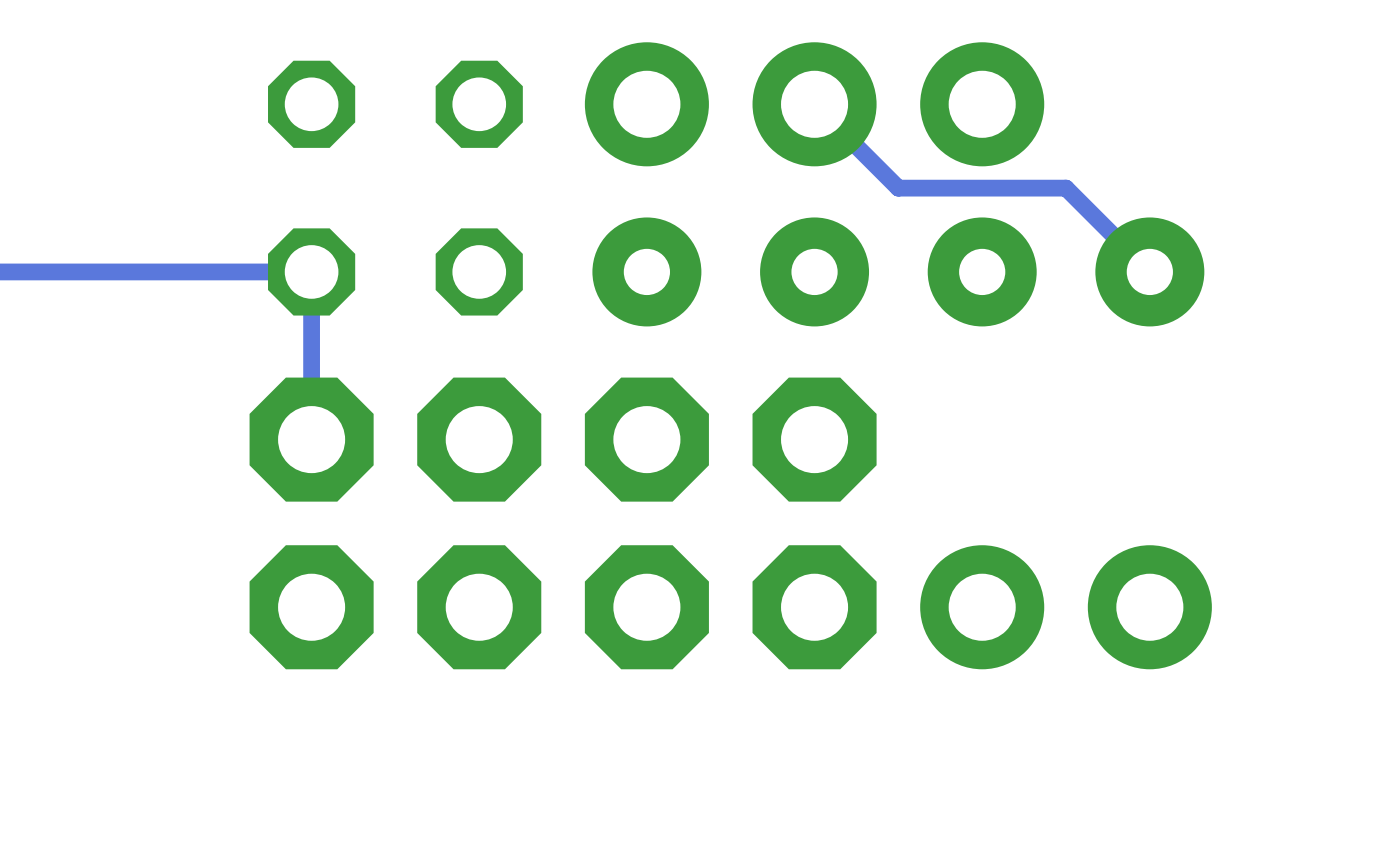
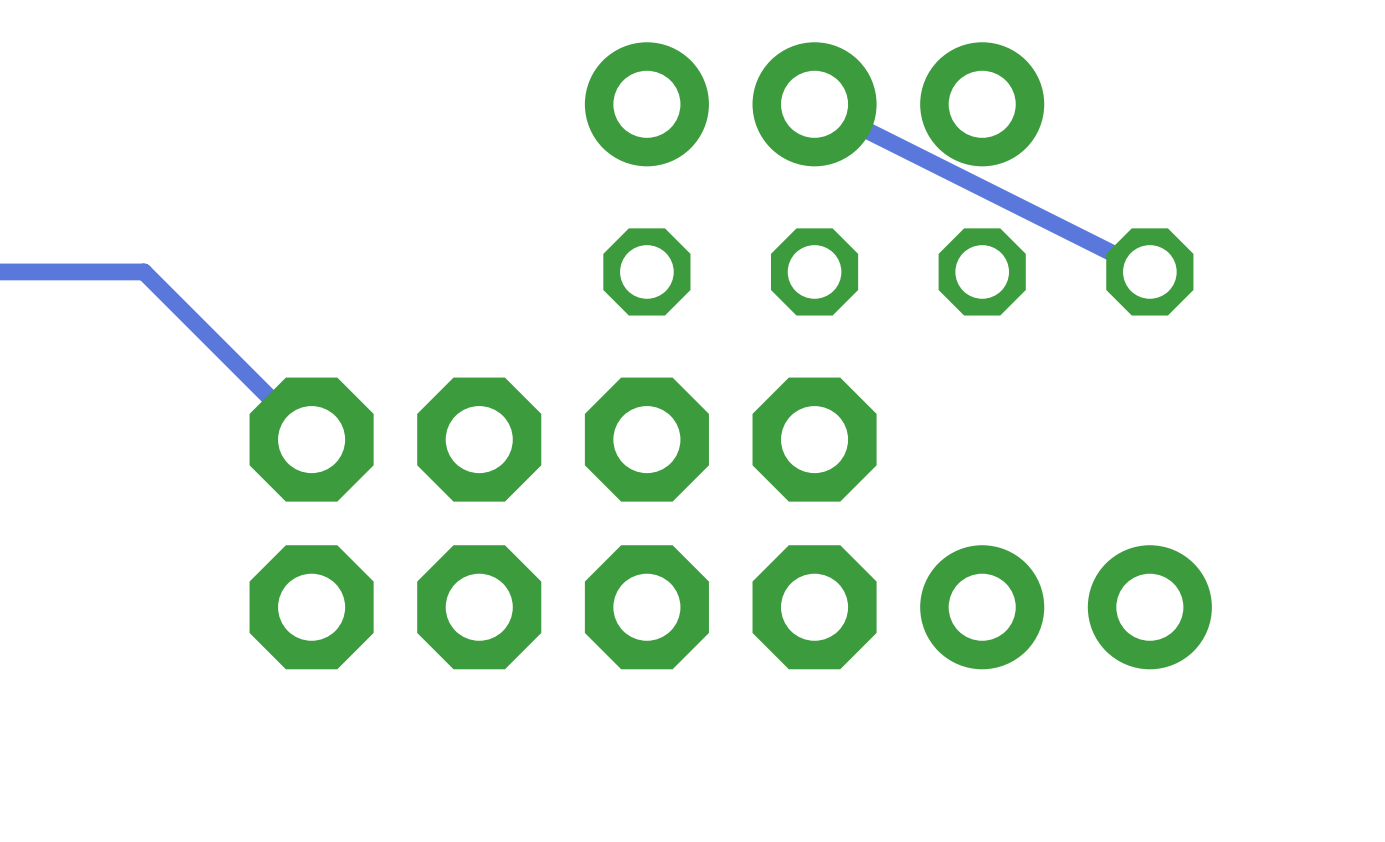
track: (814, 104) (898, 188) (1066, 188) (1149, 271) -> (814, 104) (1149, 271)
part: (311, 188) -> none
part: (479, 188) -> none
part footprint: [592, 217, 870, 327] -> [603, 228, 859, 316]
part footprint: [927, 217, 1205, 327] -> [938, 228, 1194, 316]
track: (143, 271) (311, 271) (311, 439) -> (143, 271) (311, 439)

